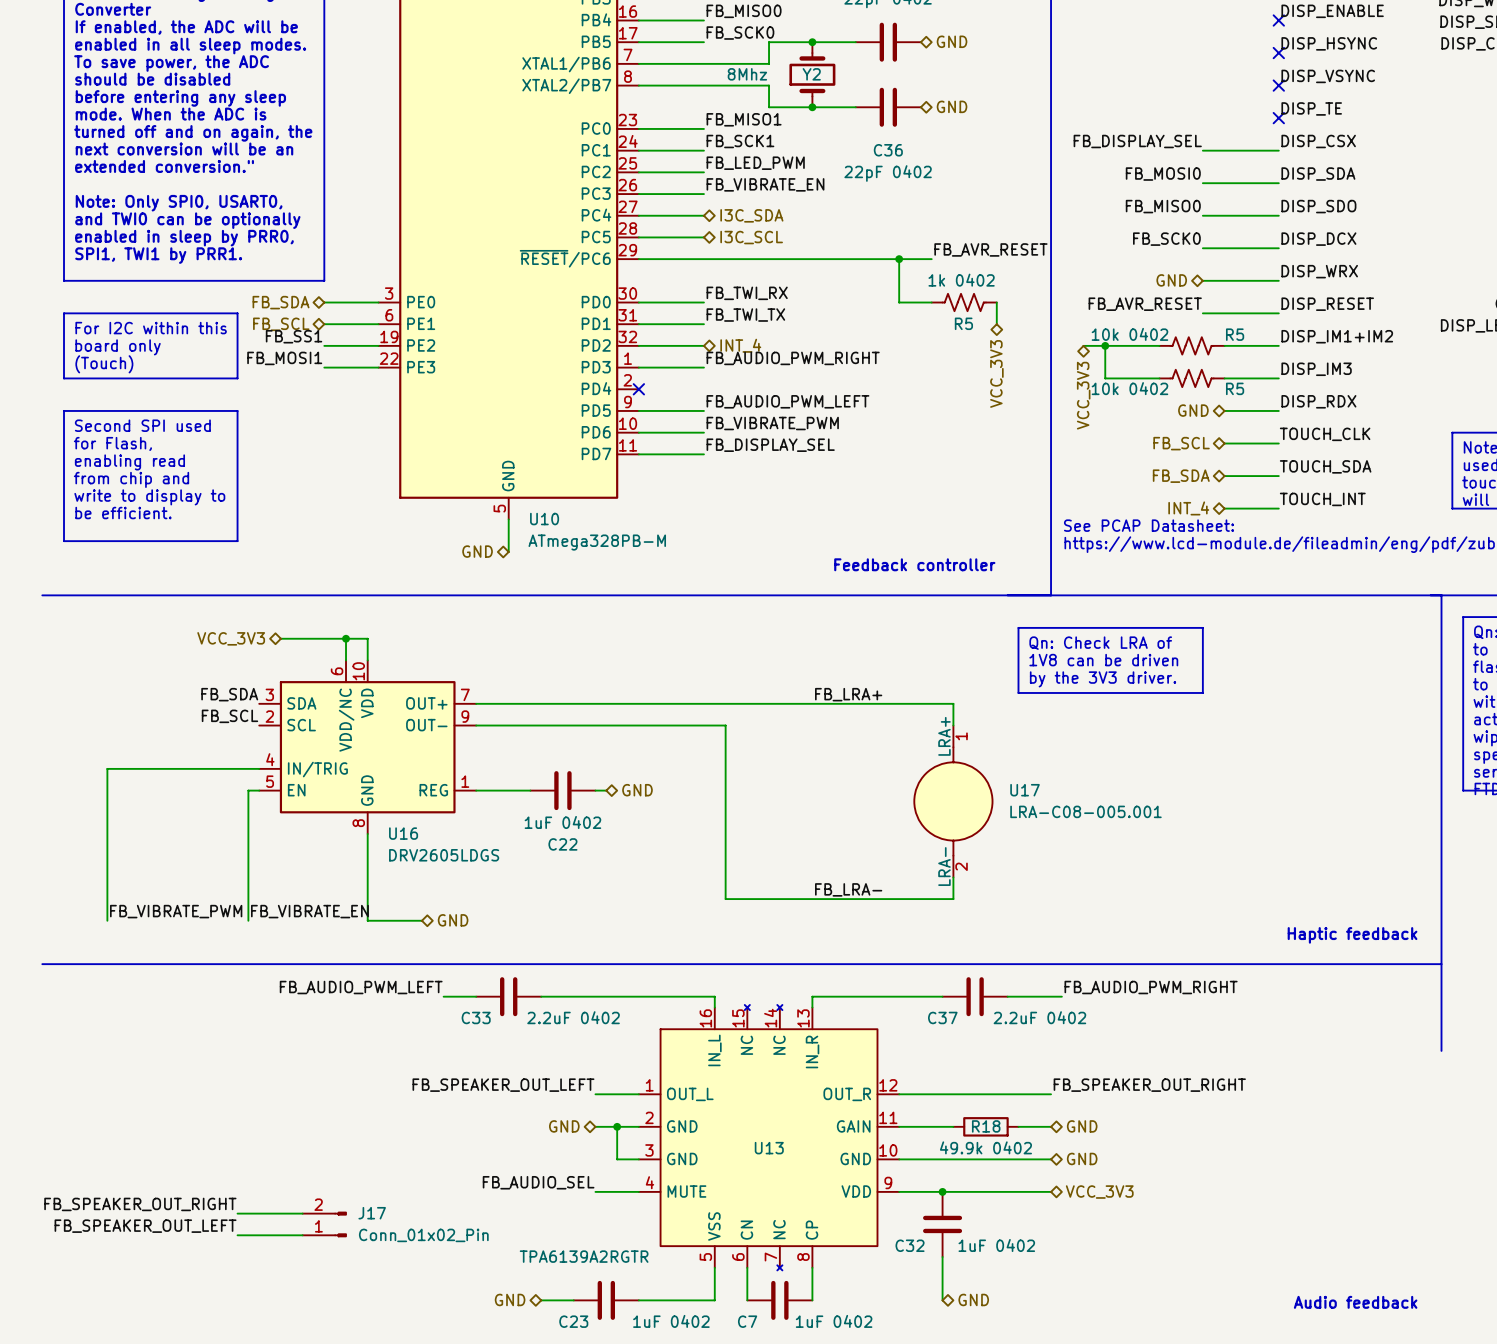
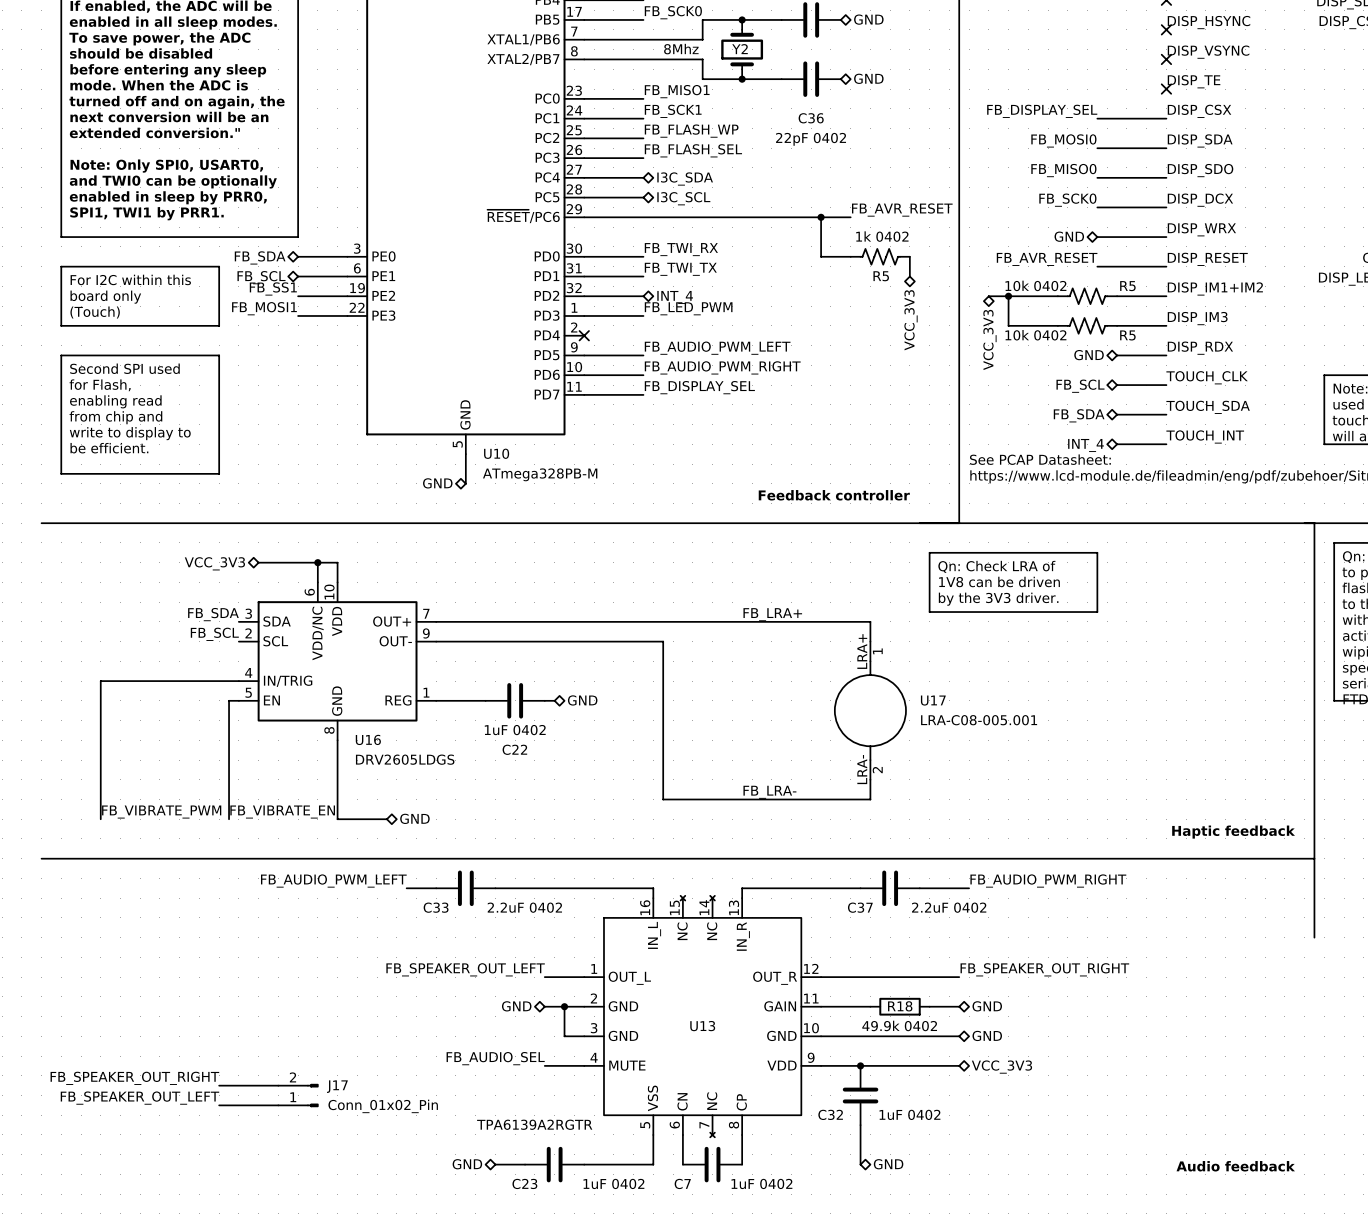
label: FB_LED_PWM (755, 163) -> FB_FLASH_WP (691, 131)
label: FB_VIBRATE_EN (765, 184) -> FB_FLASH_SEL (693, 150)
label: FB_AUDIO_PWM_RIGHT (793, 358) -> FB_LED_PWM (688, 308)
label: FB_VIBRATE_PWM (772, 423) -> FB_AUDIO_PWM_RIGHT (722, 367)

